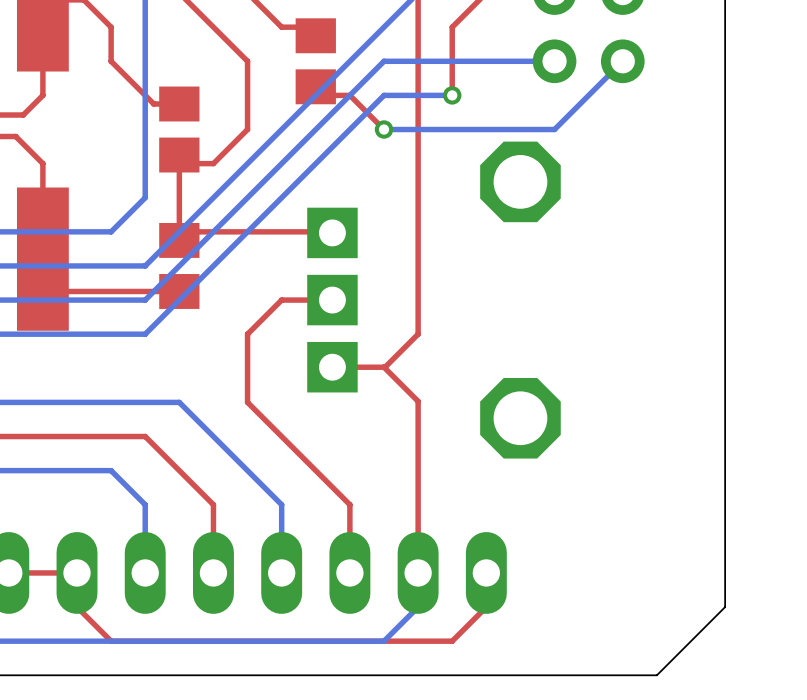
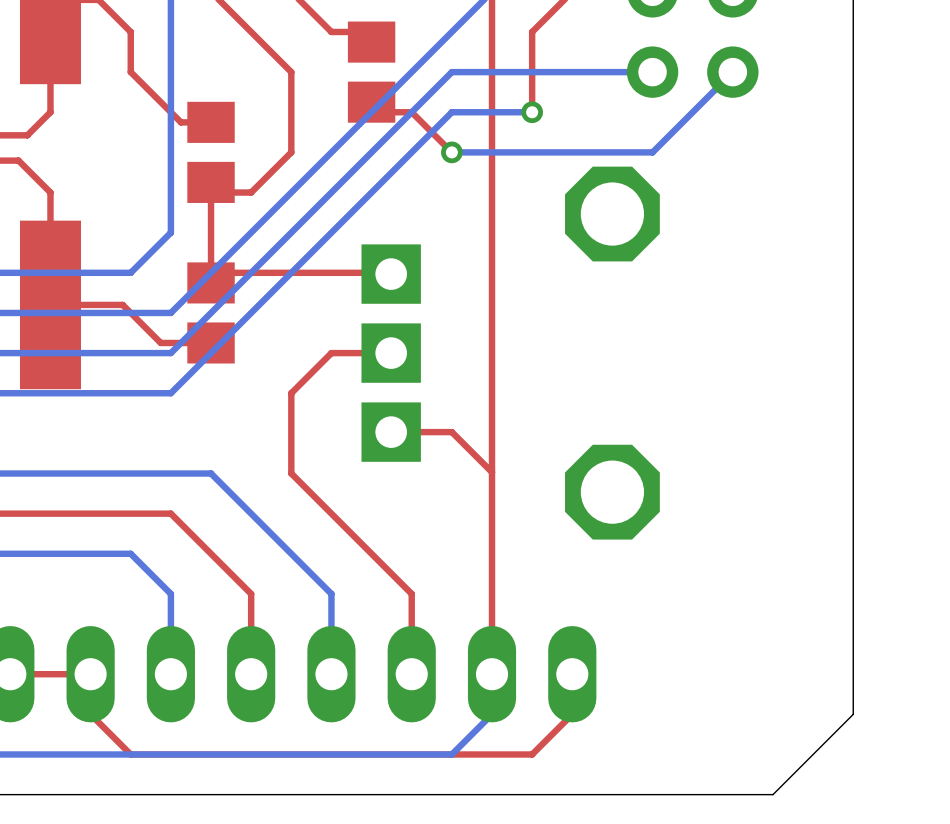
top track: (136, 291) (51, 291) (42, 300) -> (160, 342) (122, 304) (50, 304)
top track: (418, 334) (384, 367) -> (492, 393) (492, 472)

